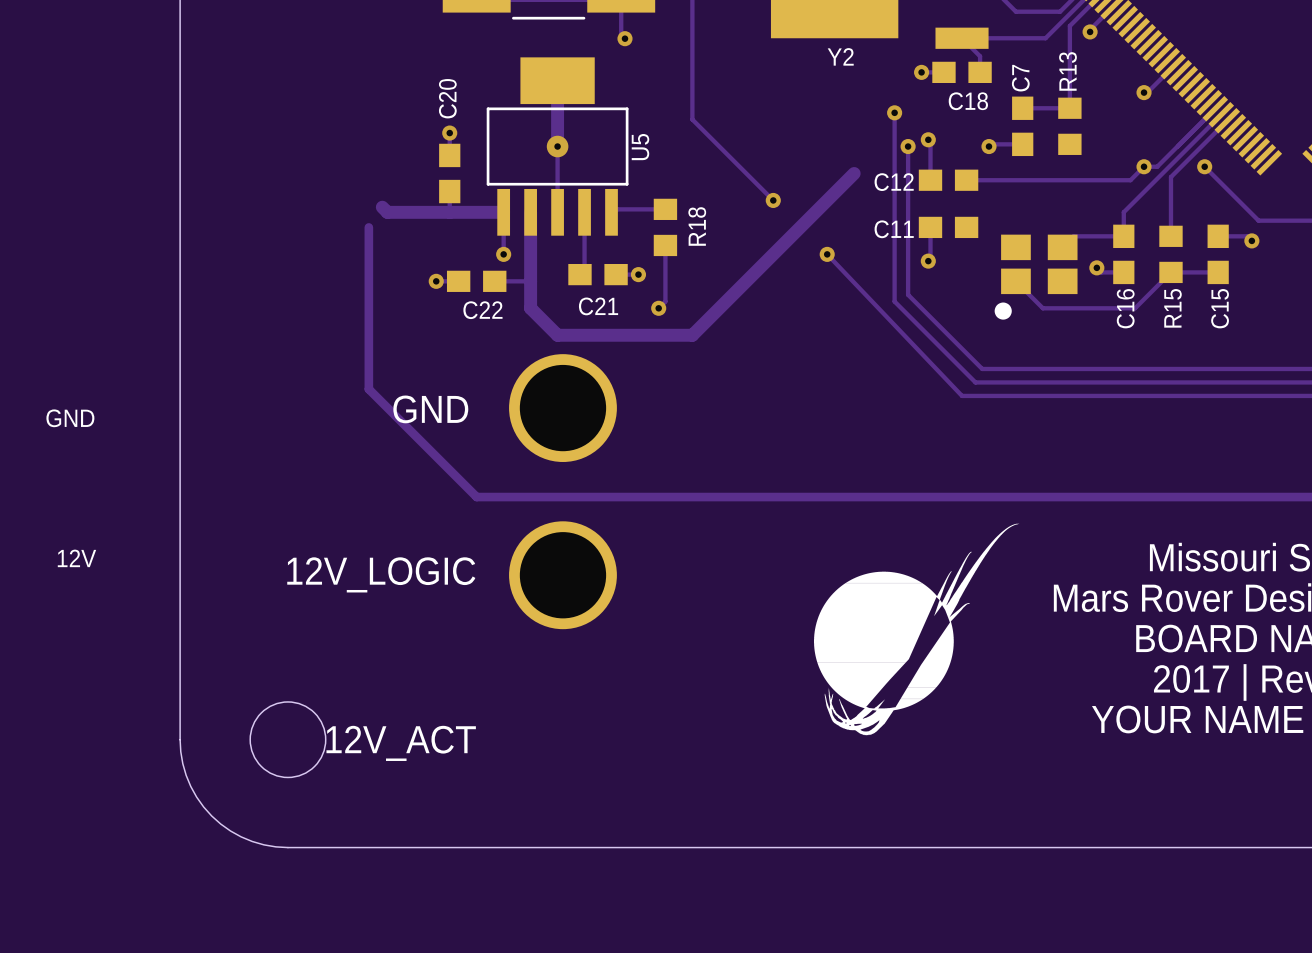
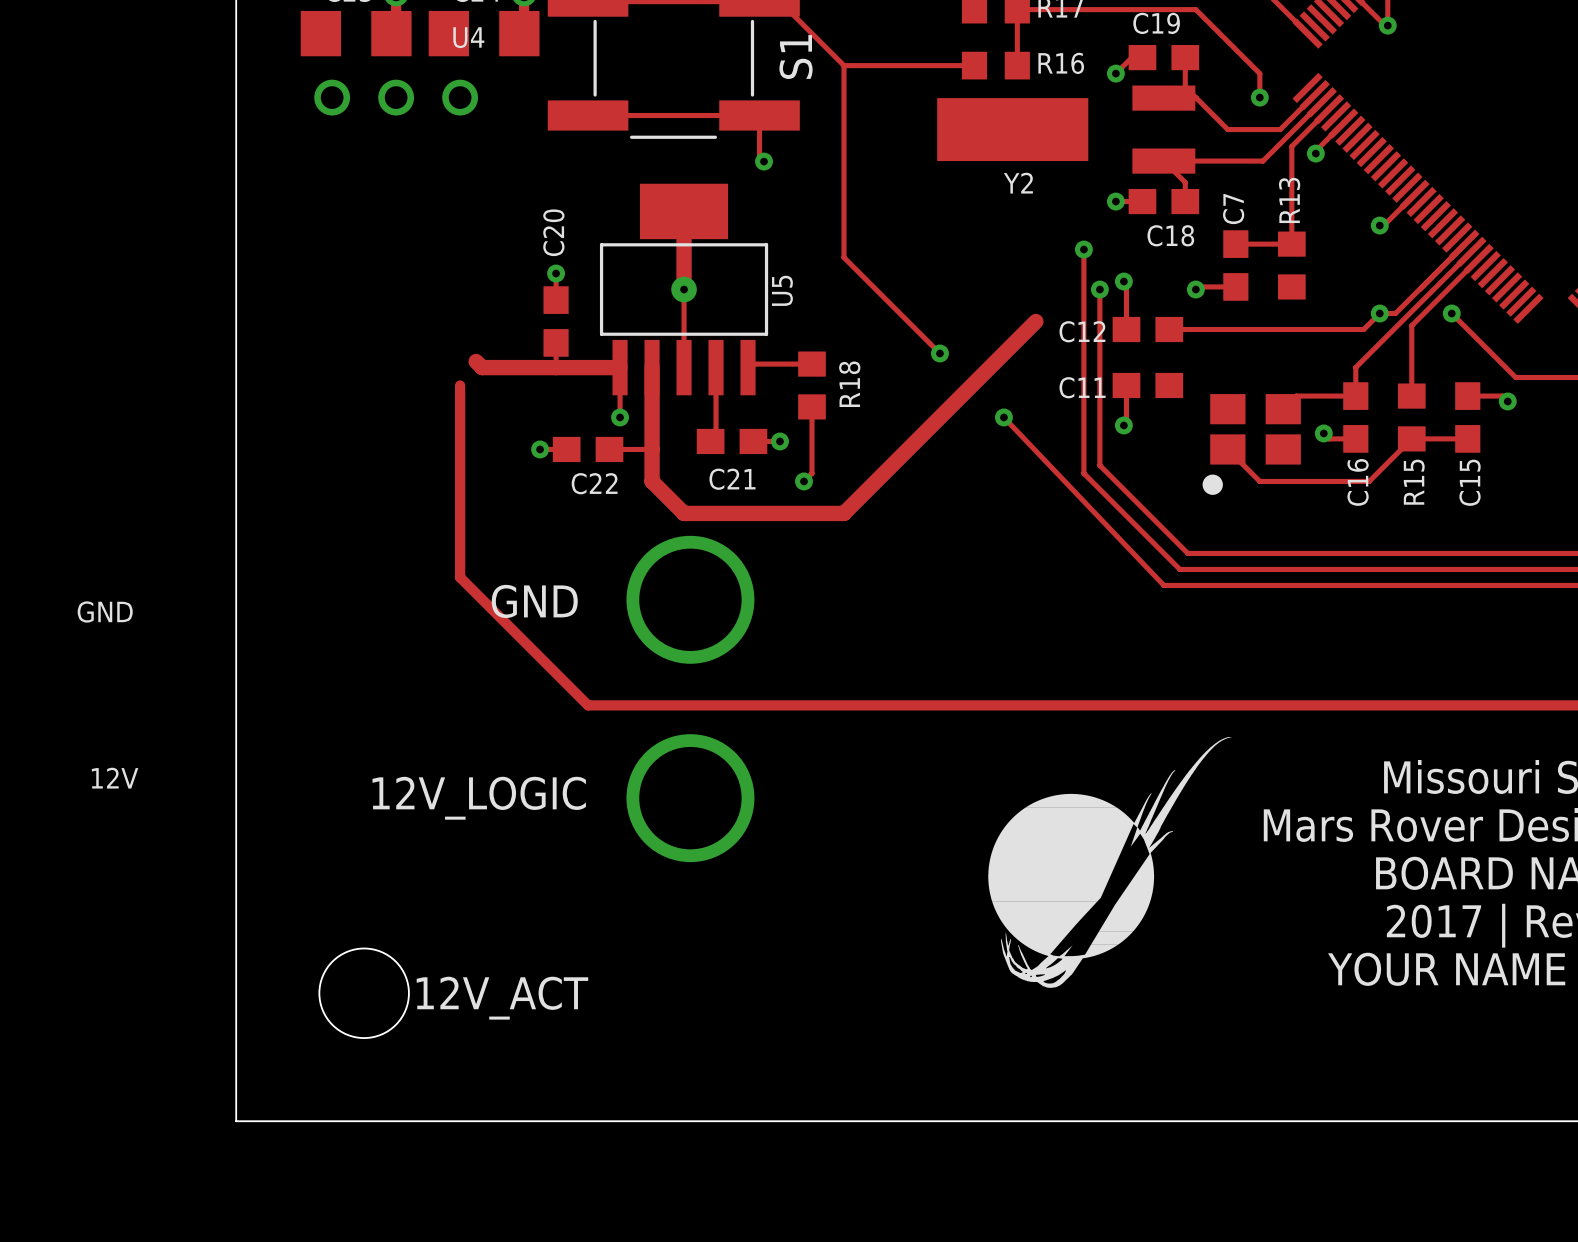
board edge: (180, 739) (182, 763) (190, 786) (211, 815) (241, 836) (263, 844) (287, 847) -> (236, 993) (236, 1121) (364, 1121)

